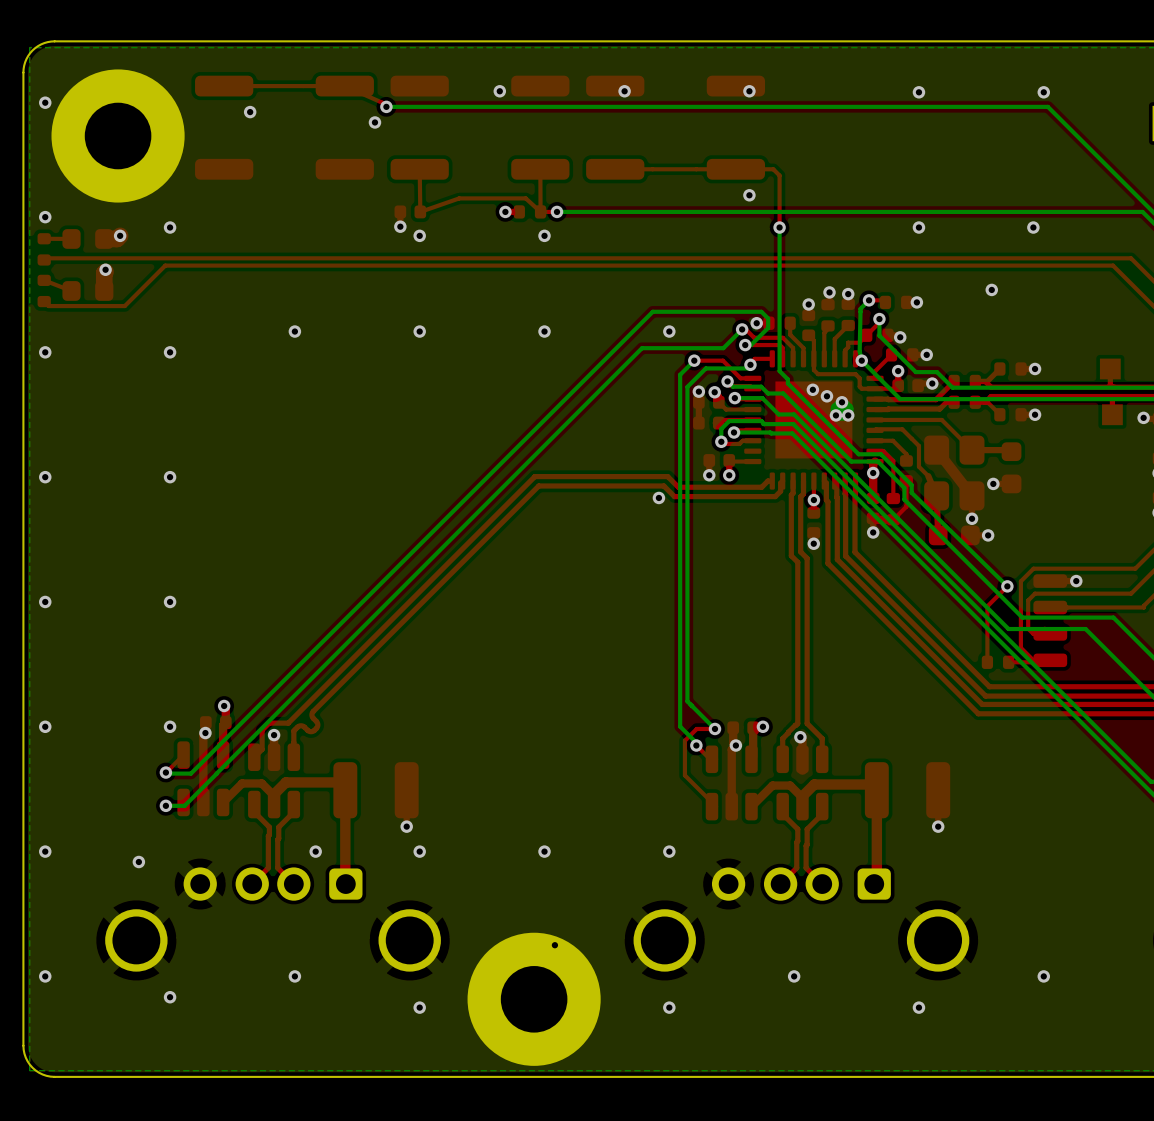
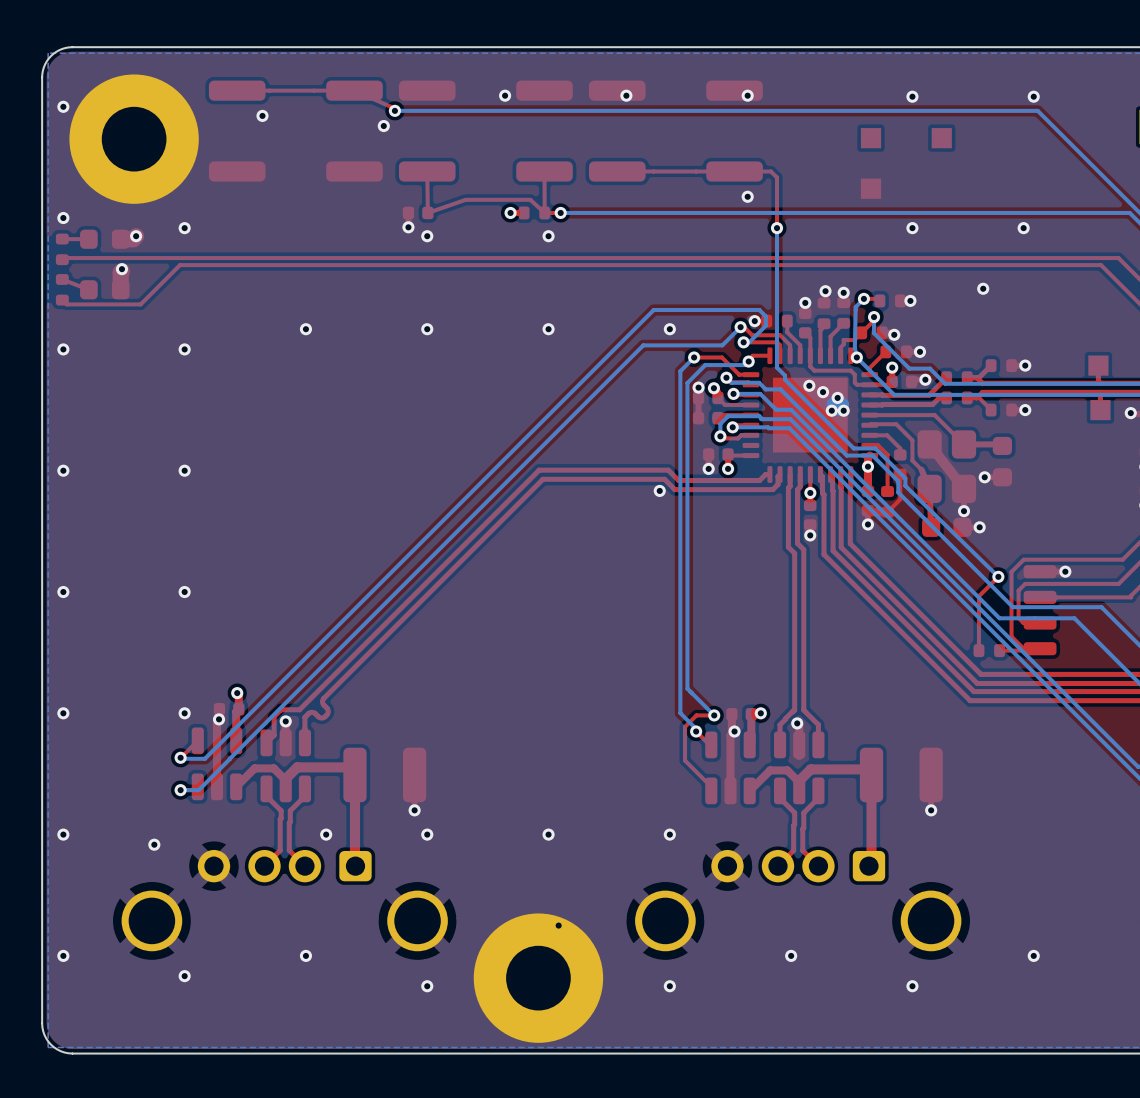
part: none -> (871, 138)
part: none -> (941, 138)
part: none -> (871, 188)

